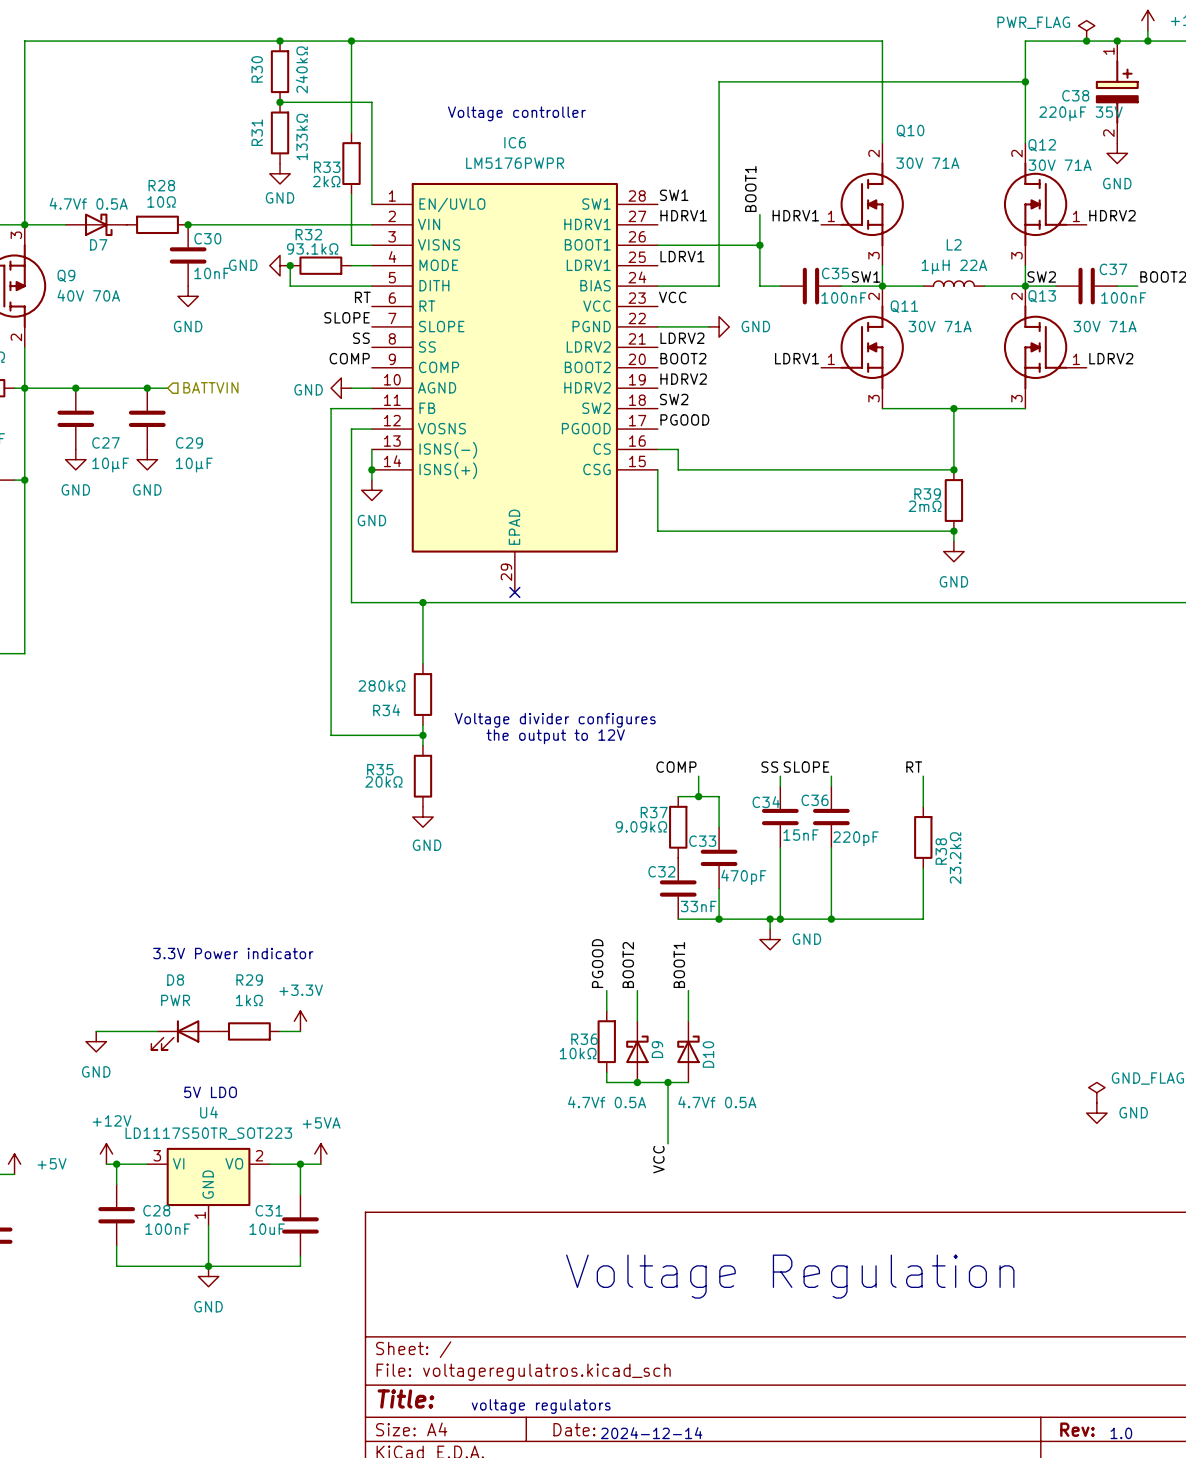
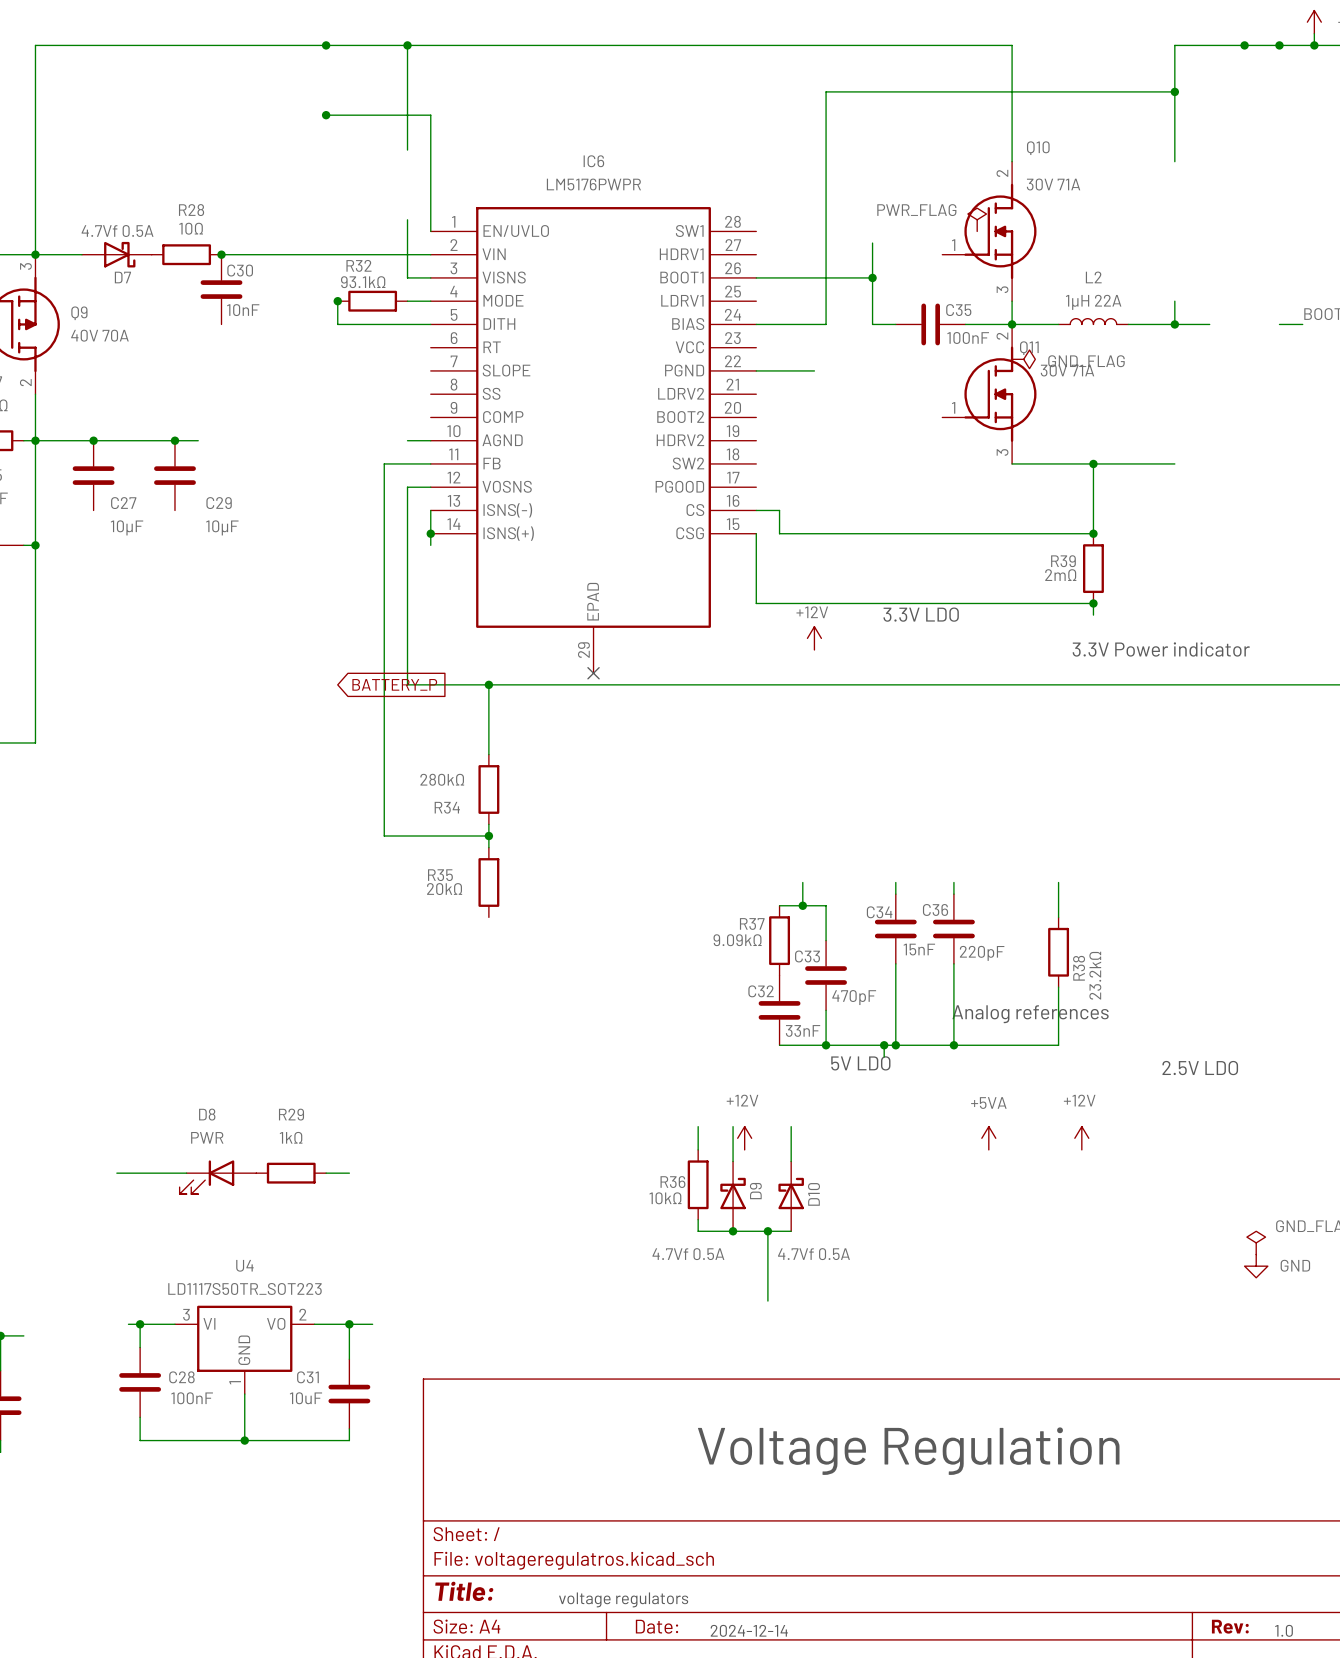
power symbol: PWR_FLAG (1086, 30) -> none
R30: 240kΩ (280, 71) -> none
C38: 220µF 35V (1117, 92) -> none
text: Voltage controller (516, 113) -> none
R31: 133kΩ (280, 132) -> none
power symbol: GND (1117, 153) -> none
R33: 2kΩ (351, 163) -> none
power symbol: GND (280, 173) -> none
label: BOOT1 (750, 189) -> none
power symbol: none -> PWR_FLAG (977, 219)
label: SW1 (674, 195) -> none
Q12: 30V 71A (1045, 204) -> none
label: HDRV1 (683, 215) -> none
label: HDRV1 (795, 215) -> none
label: HDRV2 (1112, 215) -> none
label: LDRV1 (682, 256) -> none
power symbol: GND (280, 265) -> none
label: SW1 (866, 276) -> none
label: SW2 (1041, 276) -> none
C37: 100nF (1086, 286) -> none
power symbol: GND (188, 296) -> none
label: RT (362, 297) -> none
label: VCC (672, 297) -> none
power symbol: none -> GND_FLAG (1023, 359)
label: SLOPE (347, 317) -> none
power symbol: GND (719, 326) -> none
label: SS (361, 338) -> none
label: LDRV2 (682, 338) -> none
Q13: 30V 71A (1045, 347) -> none
label: COMP (349, 358) -> none
label: BOOT2 (683, 358) -> none
label: LDRV1 (797, 358) -> none
label: LDRV2 (1111, 358) -> none
label: HDRV2 (683, 379) -> none
hierarchical label: BATTVIN (210, 387) -> none
power symbol: GND (341, 388) -> none
label: SW2 (674, 399) -> none
label: PGOOD (684, 419) -> none
power symbol: GND (75, 459) -> none
power symbol: GND (147, 459) -> none
power symbol: GND (371, 490) -> none
text: none -> 3.3V LDO (921, 614)
power symbol: GND (953, 551) -> none
power symbol: none -> +12V (814, 638)
text: none -> 3.3V Power indicator (1161, 649)
global label: none -> BATTERY_P (394, 684)
text: Voltage divider configures (555, 720) -> none
text: the output to 12V (555, 736) -> none
label: COMP (676, 767) -> none
label: SS (769, 767) -> none
label: SLOPE (806, 767) -> none
label: RT (914, 767) -> none
power symbol: GND (422, 817) -> none
text: none -> Analog references (1030, 1014)
text: none -> 5V LDO (860, 1063)
power symbol: GND (770, 939) -> none
text: none -> 2.5V LDO (1200, 1068)
text: 3.3V Power indicator (233, 953) -> none
label: PGOOD (597, 963) -> none
label: BOOT2 (628, 965) -> none
label: BOOT1 (679, 965) -> none
power symbol: none -> +12V (744, 1138)
power symbol: none -> +5VA (988, 1138)
power symbol: none -> +12V (1081, 1138)
power symbol: +3.3V (300, 1021) -> none
power symbol: GND (96, 1041) -> none
text: 5V LDO (210, 1092) -> none
power symbol: +12V (106, 1153) -> none
power symbol: +5VA (320, 1153) -> none
label: VCC (658, 1159) -> none
power symbol: +5V (14, 1164) -> none
power symbol: GND (208, 1276) -> none

